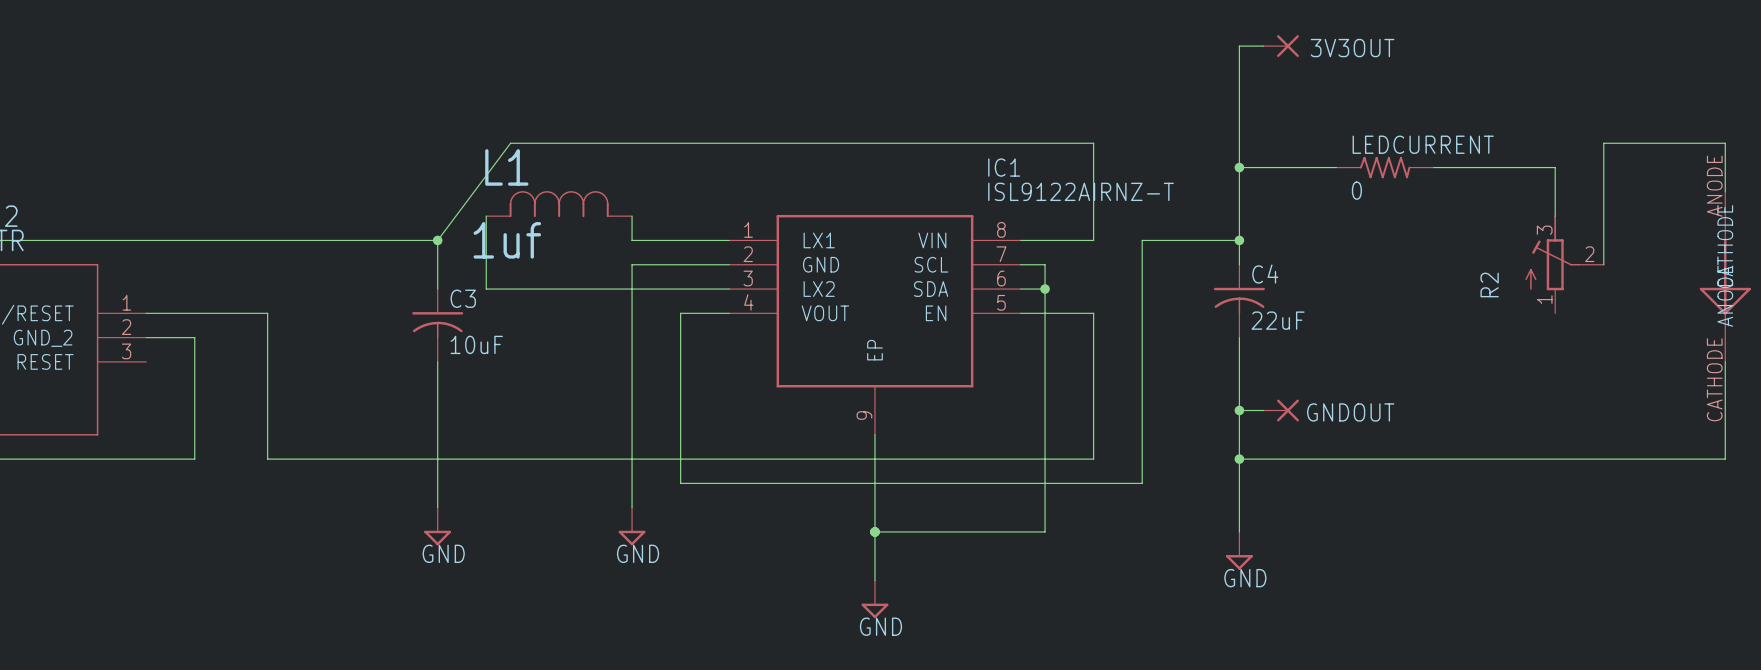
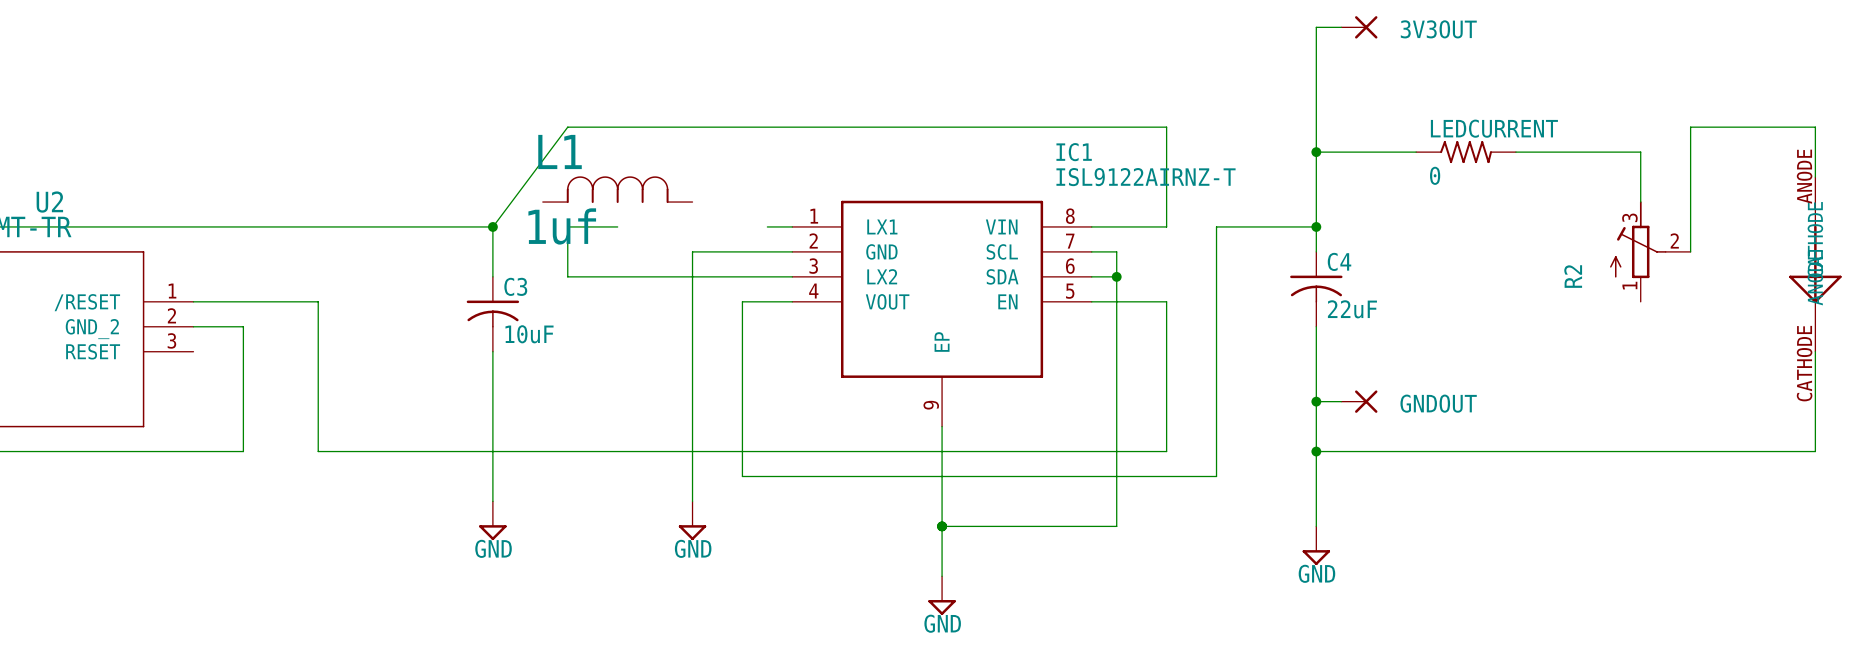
wire: (486, 216) (486, 289) (510, 289) -> (617, 226) (567, 226) (567, 276)
wire: (632, 216) (632, 240) (704, 240) -> none

